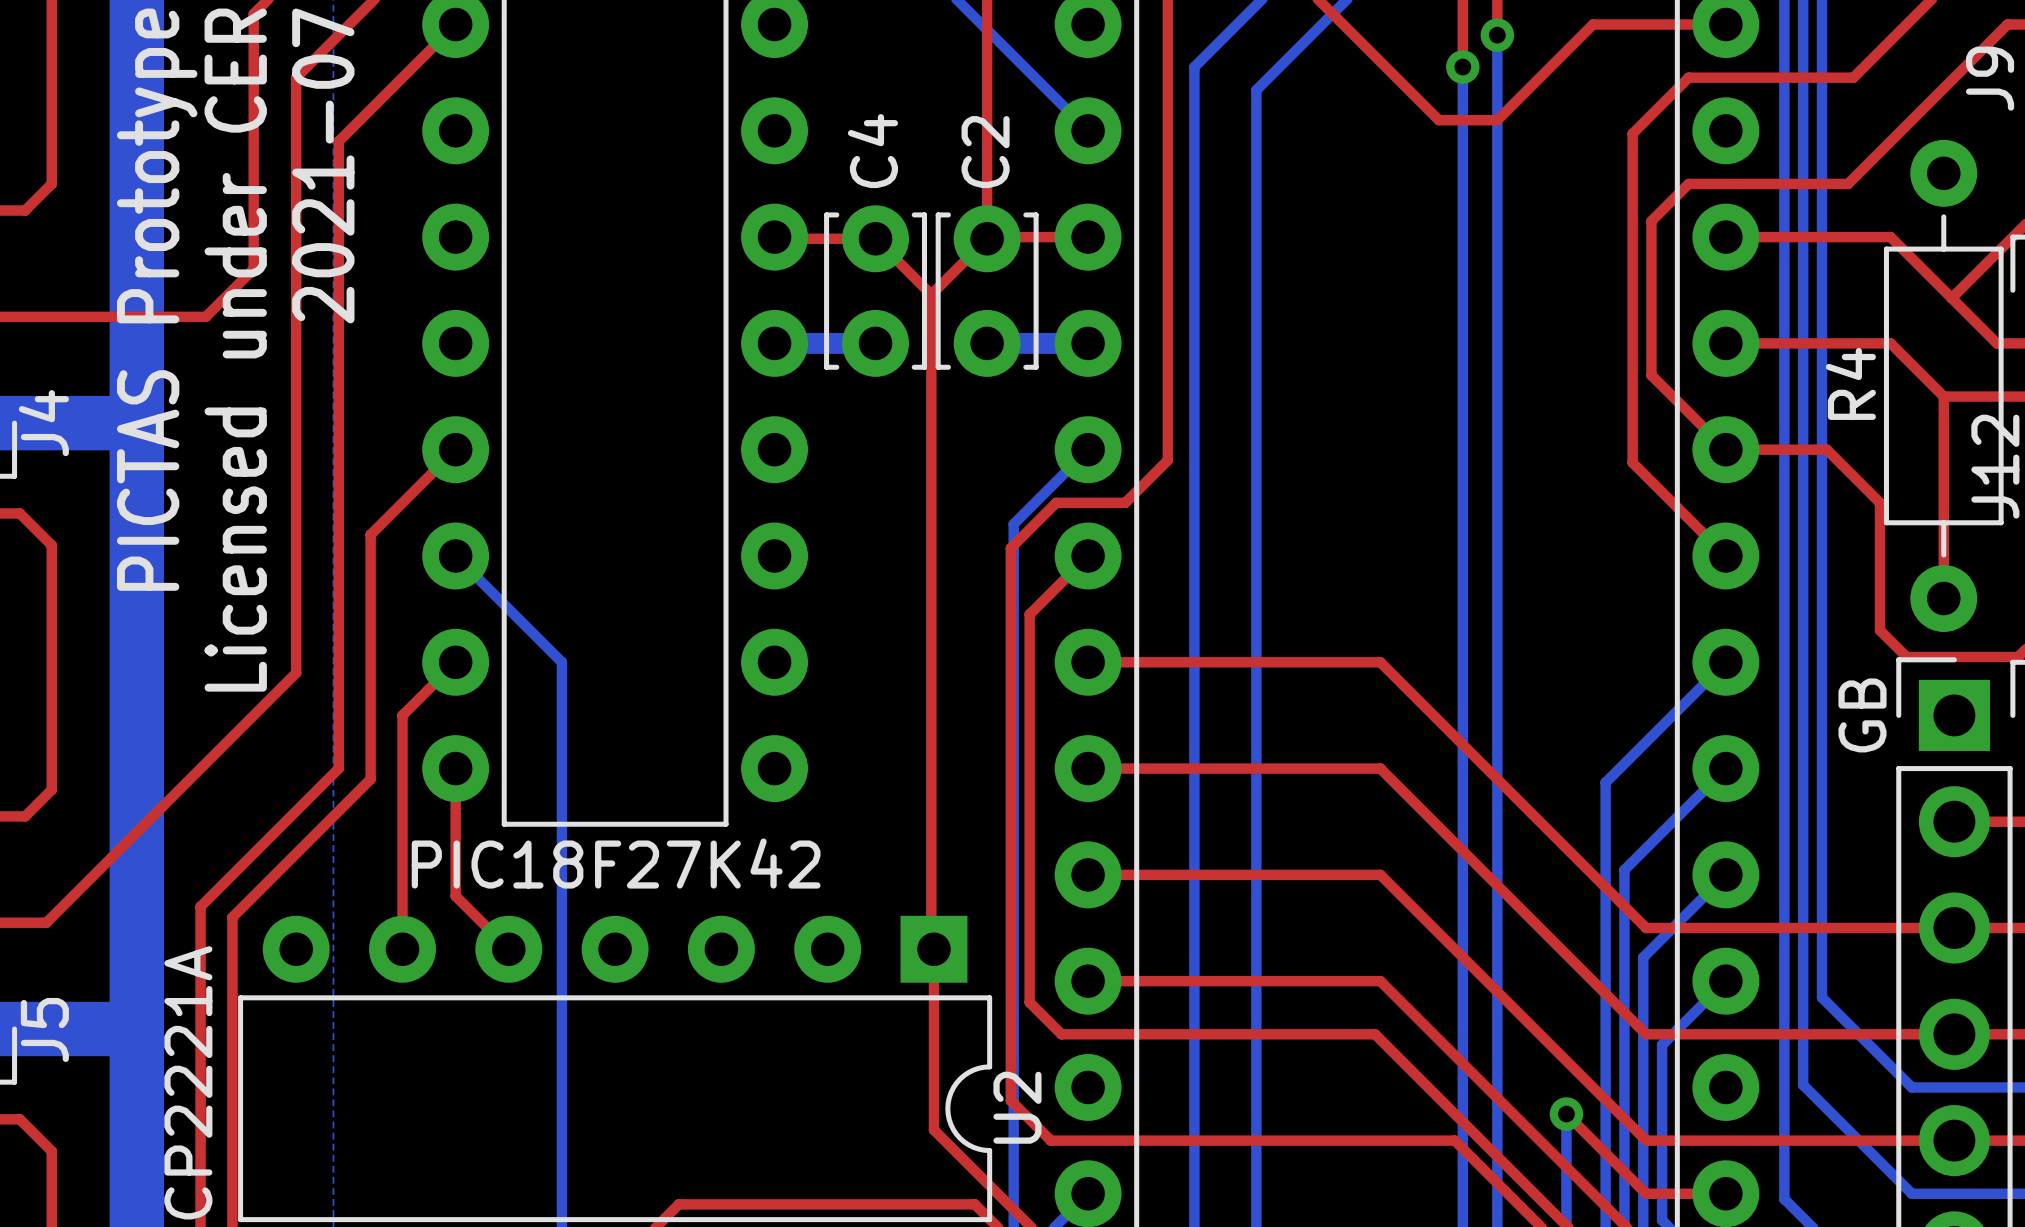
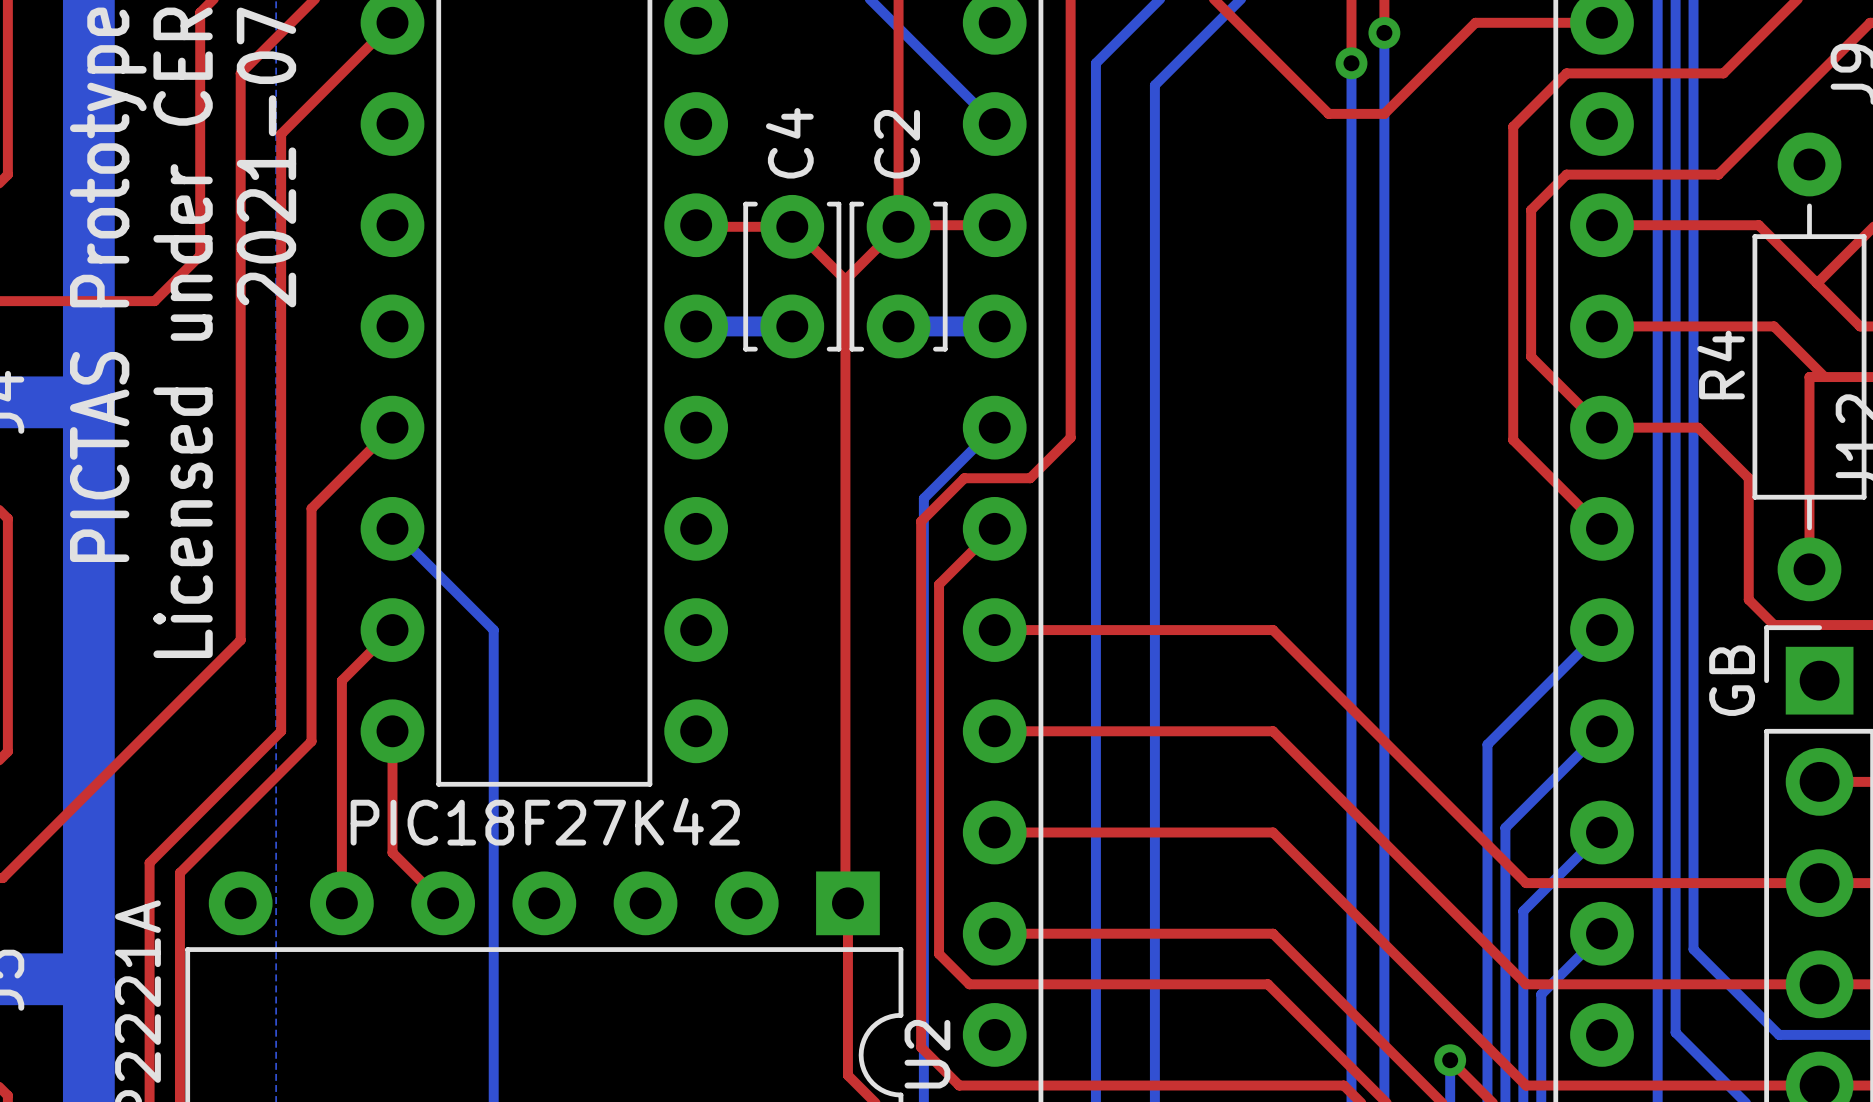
top track: (1890, 343) (1943, 396) -> (1758, 326) (1774, 326) (1824, 377)

